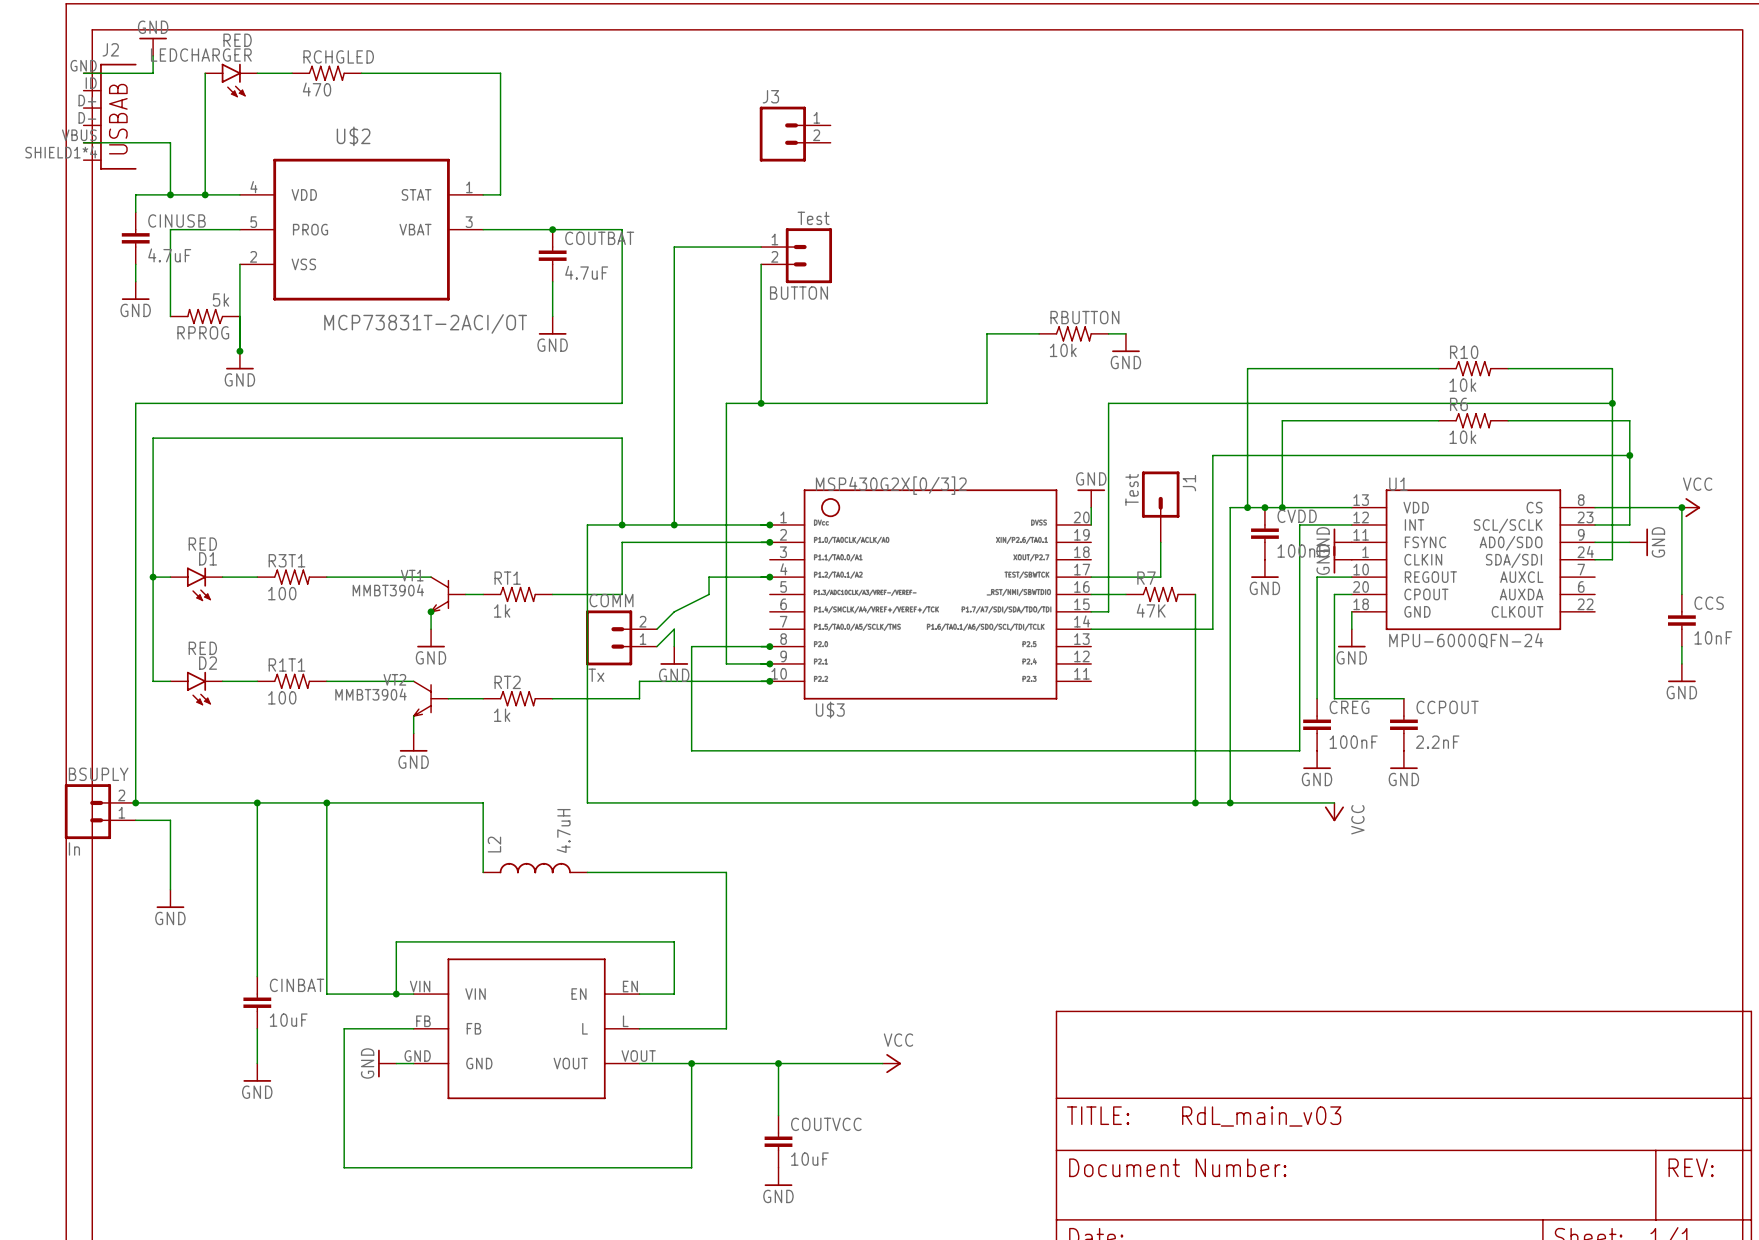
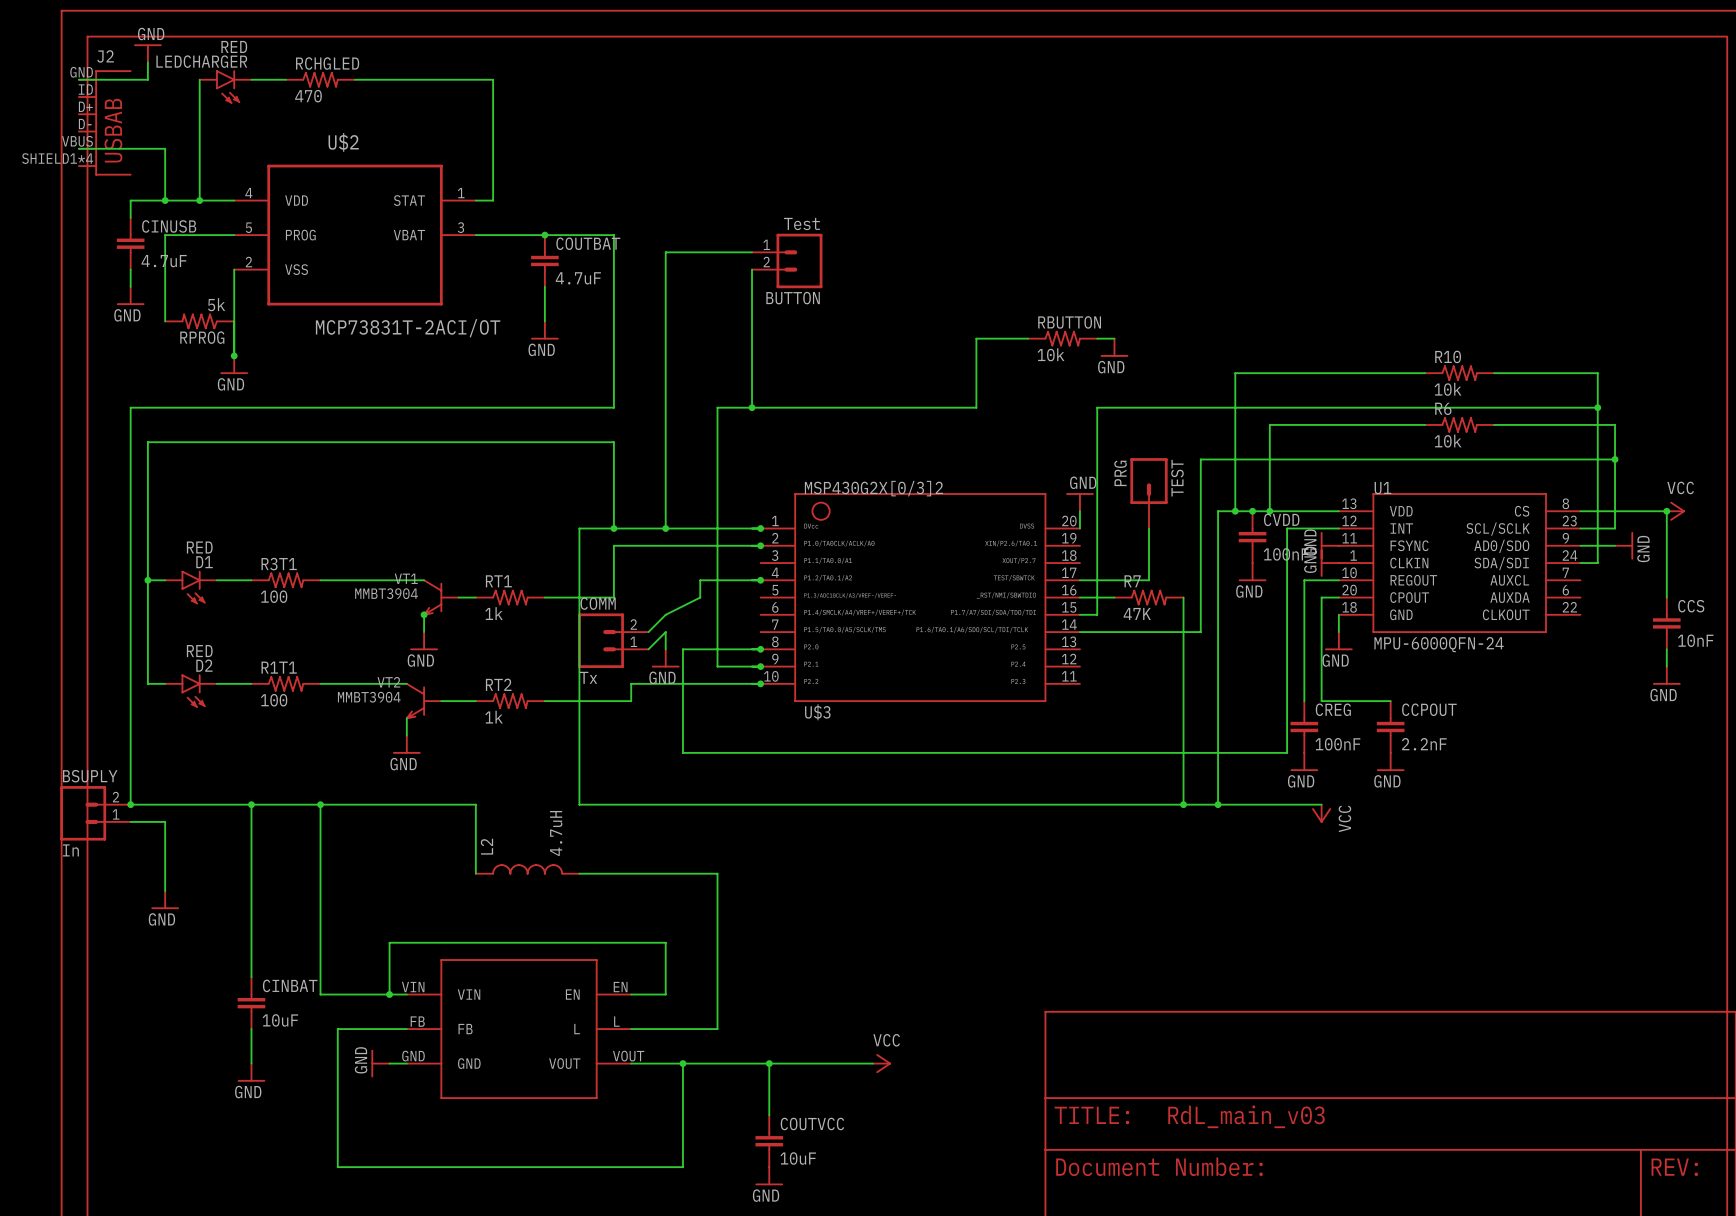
J3: (795, 134) -> none
TEST: none -> PRG (1149, 493)
J1: Test (1160, 506) -> none

